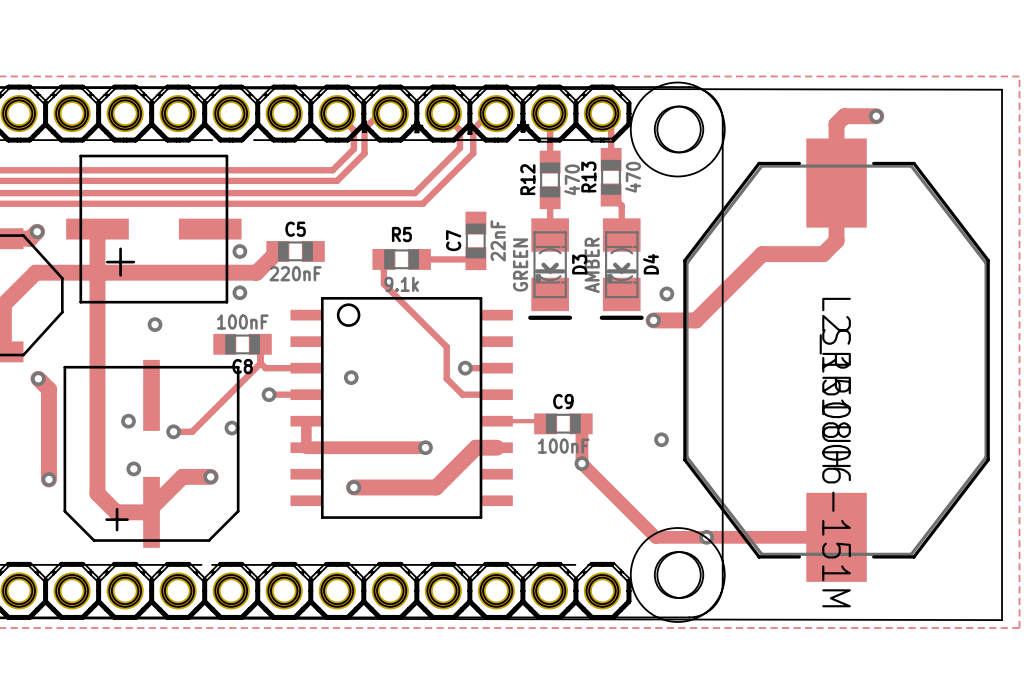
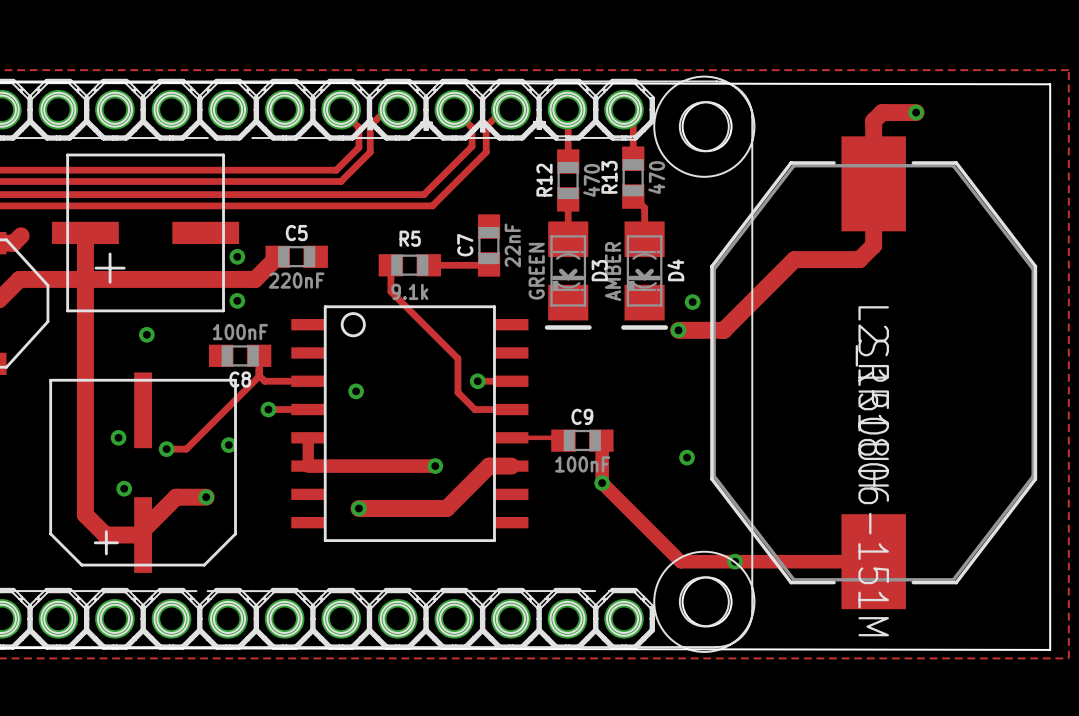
via: (37, 231) -> none
track: (38, 378) (48, 389) (48, 479) -> none
via: (38, 378) -> none
via: (48, 479) -> none

